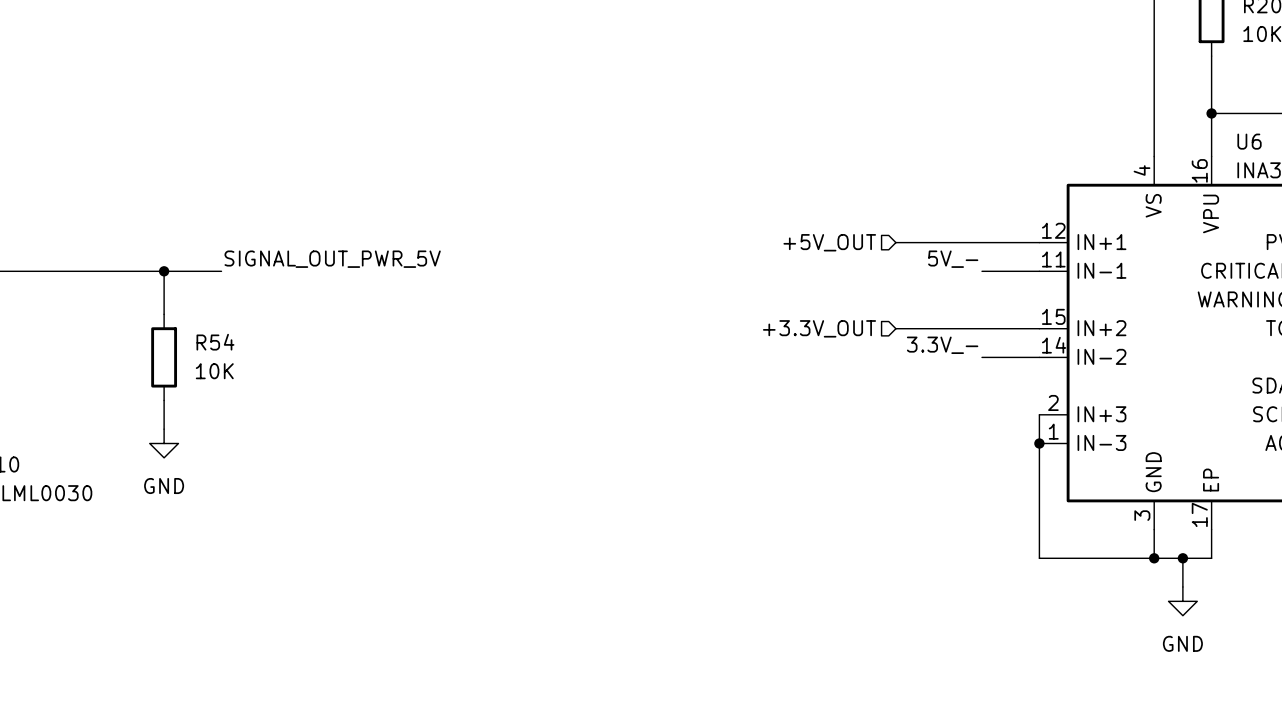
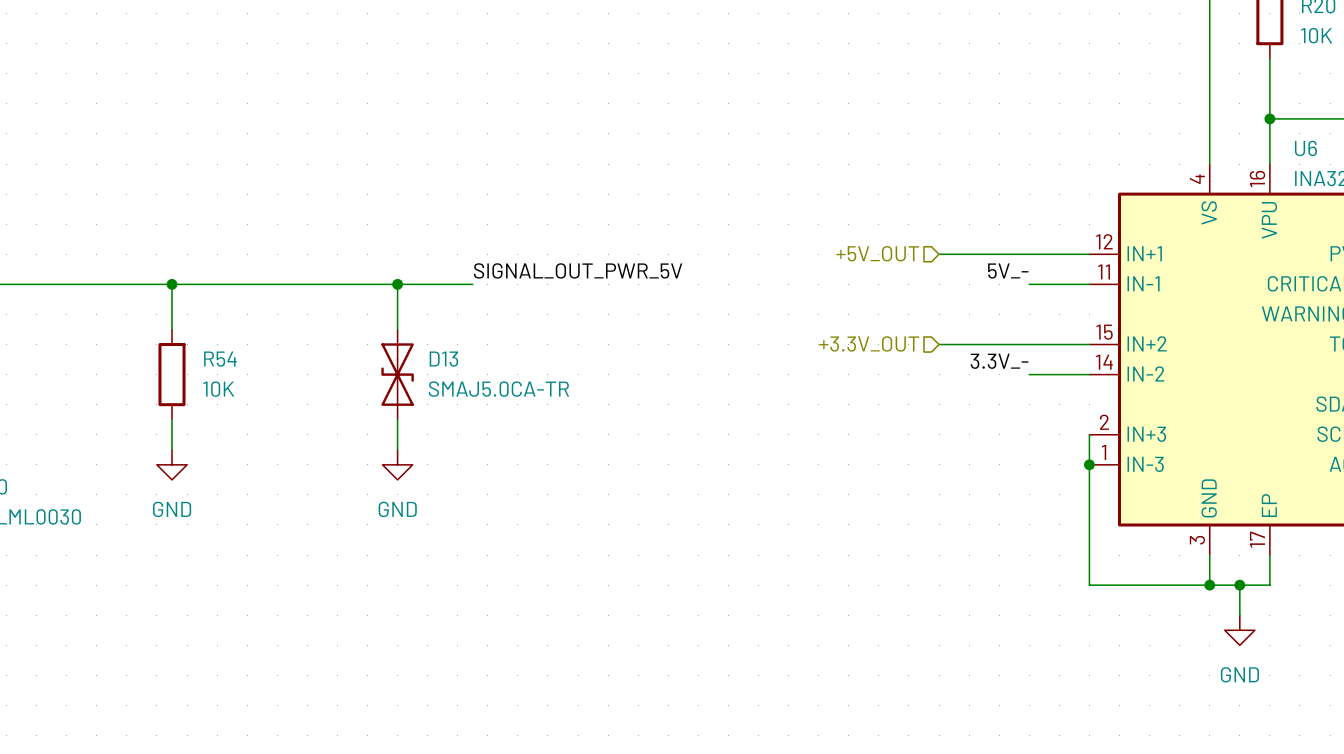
label position: SIGNAL_OUT_PWR_5V (332, 259) -> SIGNAL_OUT_PWR_5V (578, 270)
wire: none -> (232, 284) (472, 284)
wire: none -> (397, 284) (397, 329)
junction: none -> (397, 284)
D13: none -> SMAJ5.0CA-TR (397, 374)
wire: none -> (397, 419) (397, 449)
power symbol: none -> GND (397, 464)

